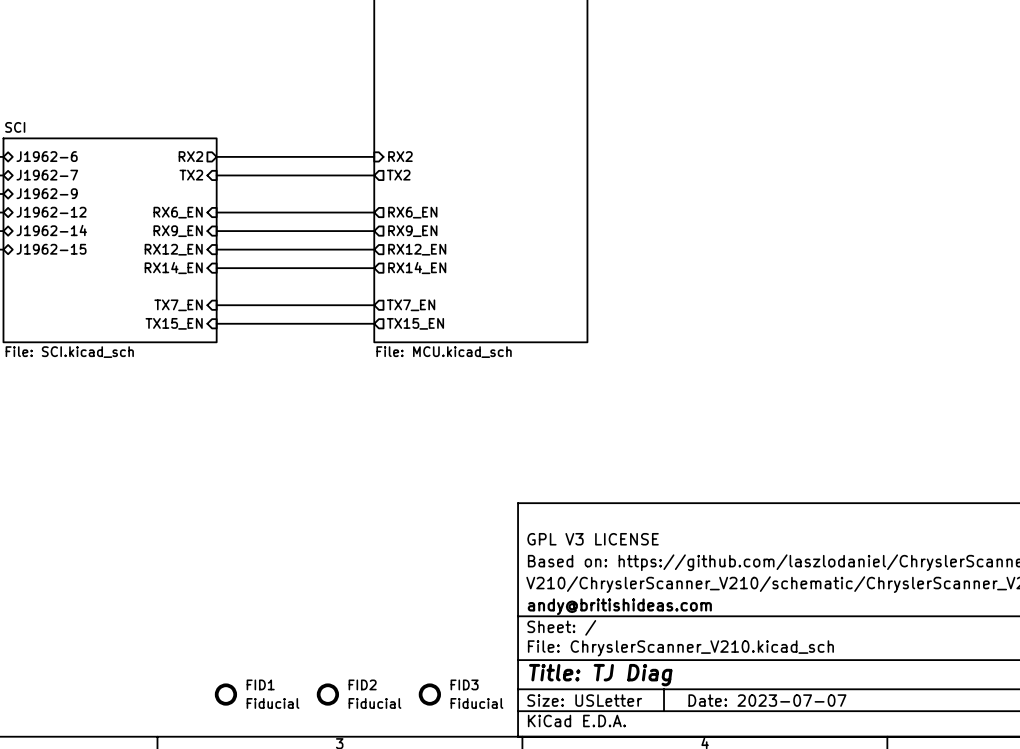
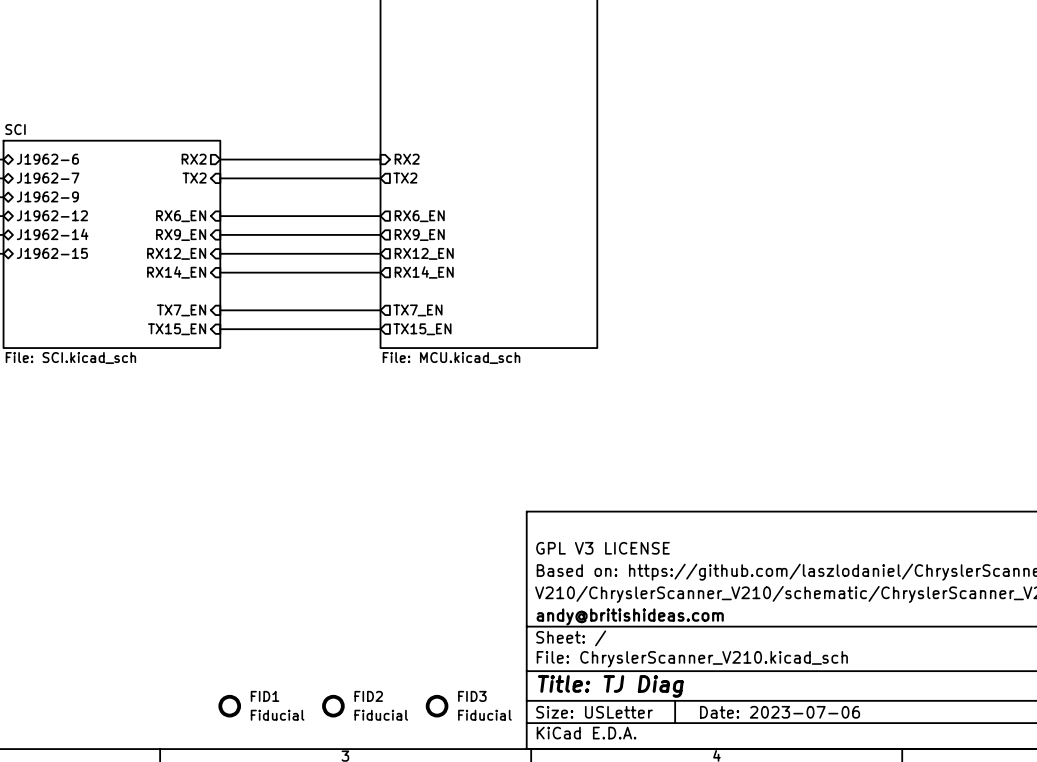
title block: Date: 2023-07-07 (767, 700) -> Date: 2023-07-06 (780, 712)

